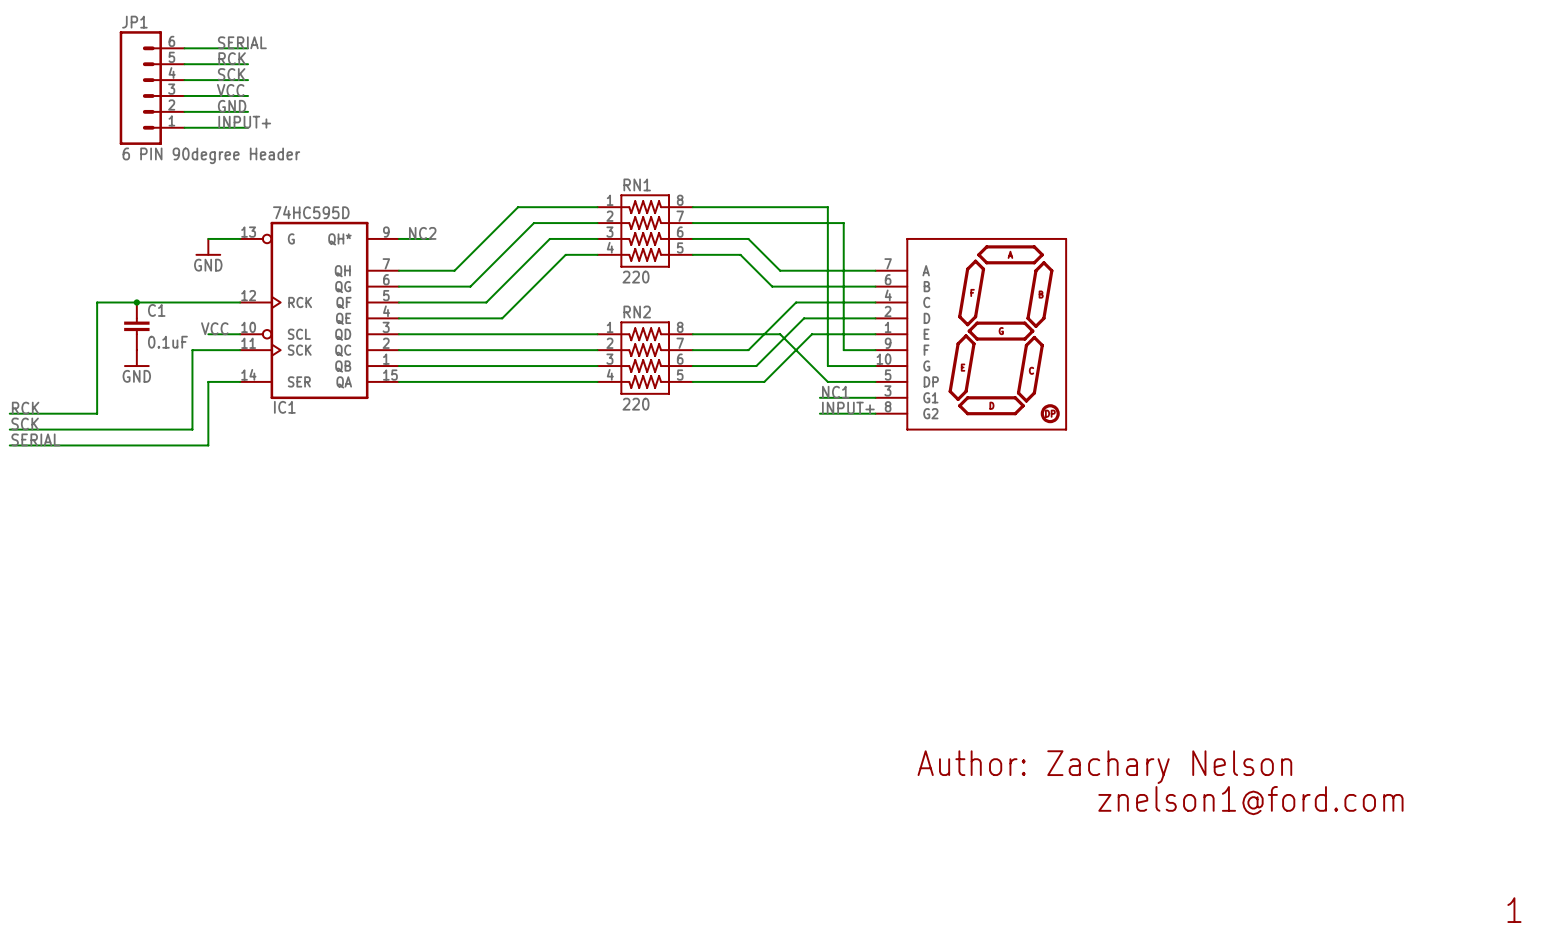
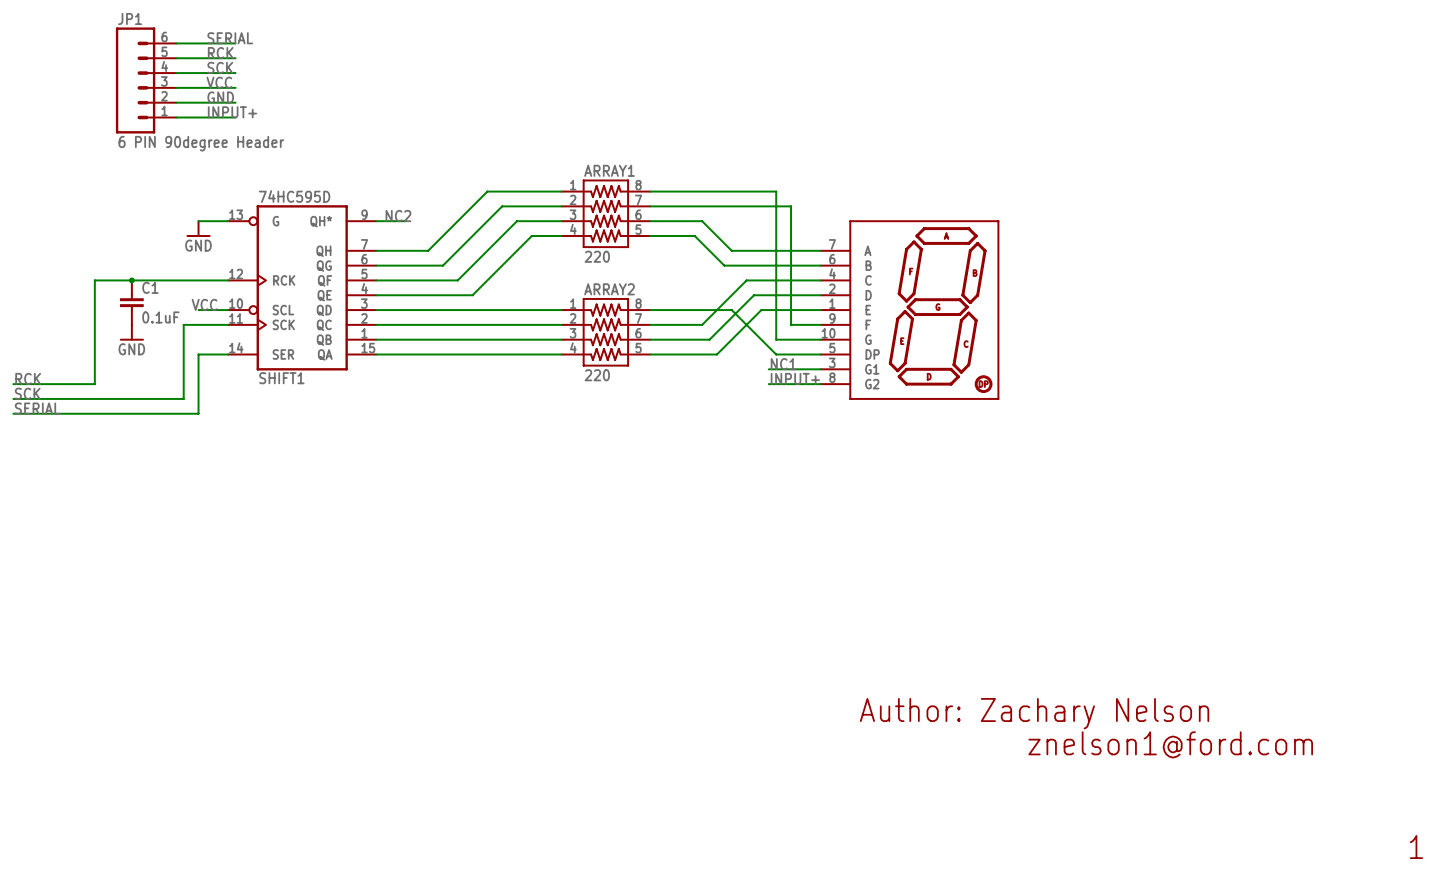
RN1 name: RN1 (637, 184) -> ARRAY1 (609, 170)
RN2 name: RN2 (637, 312) -> ARRAY2 (609, 289)
IC1 name: IC1 (284, 407) -> SHIFT1 (281, 378)

